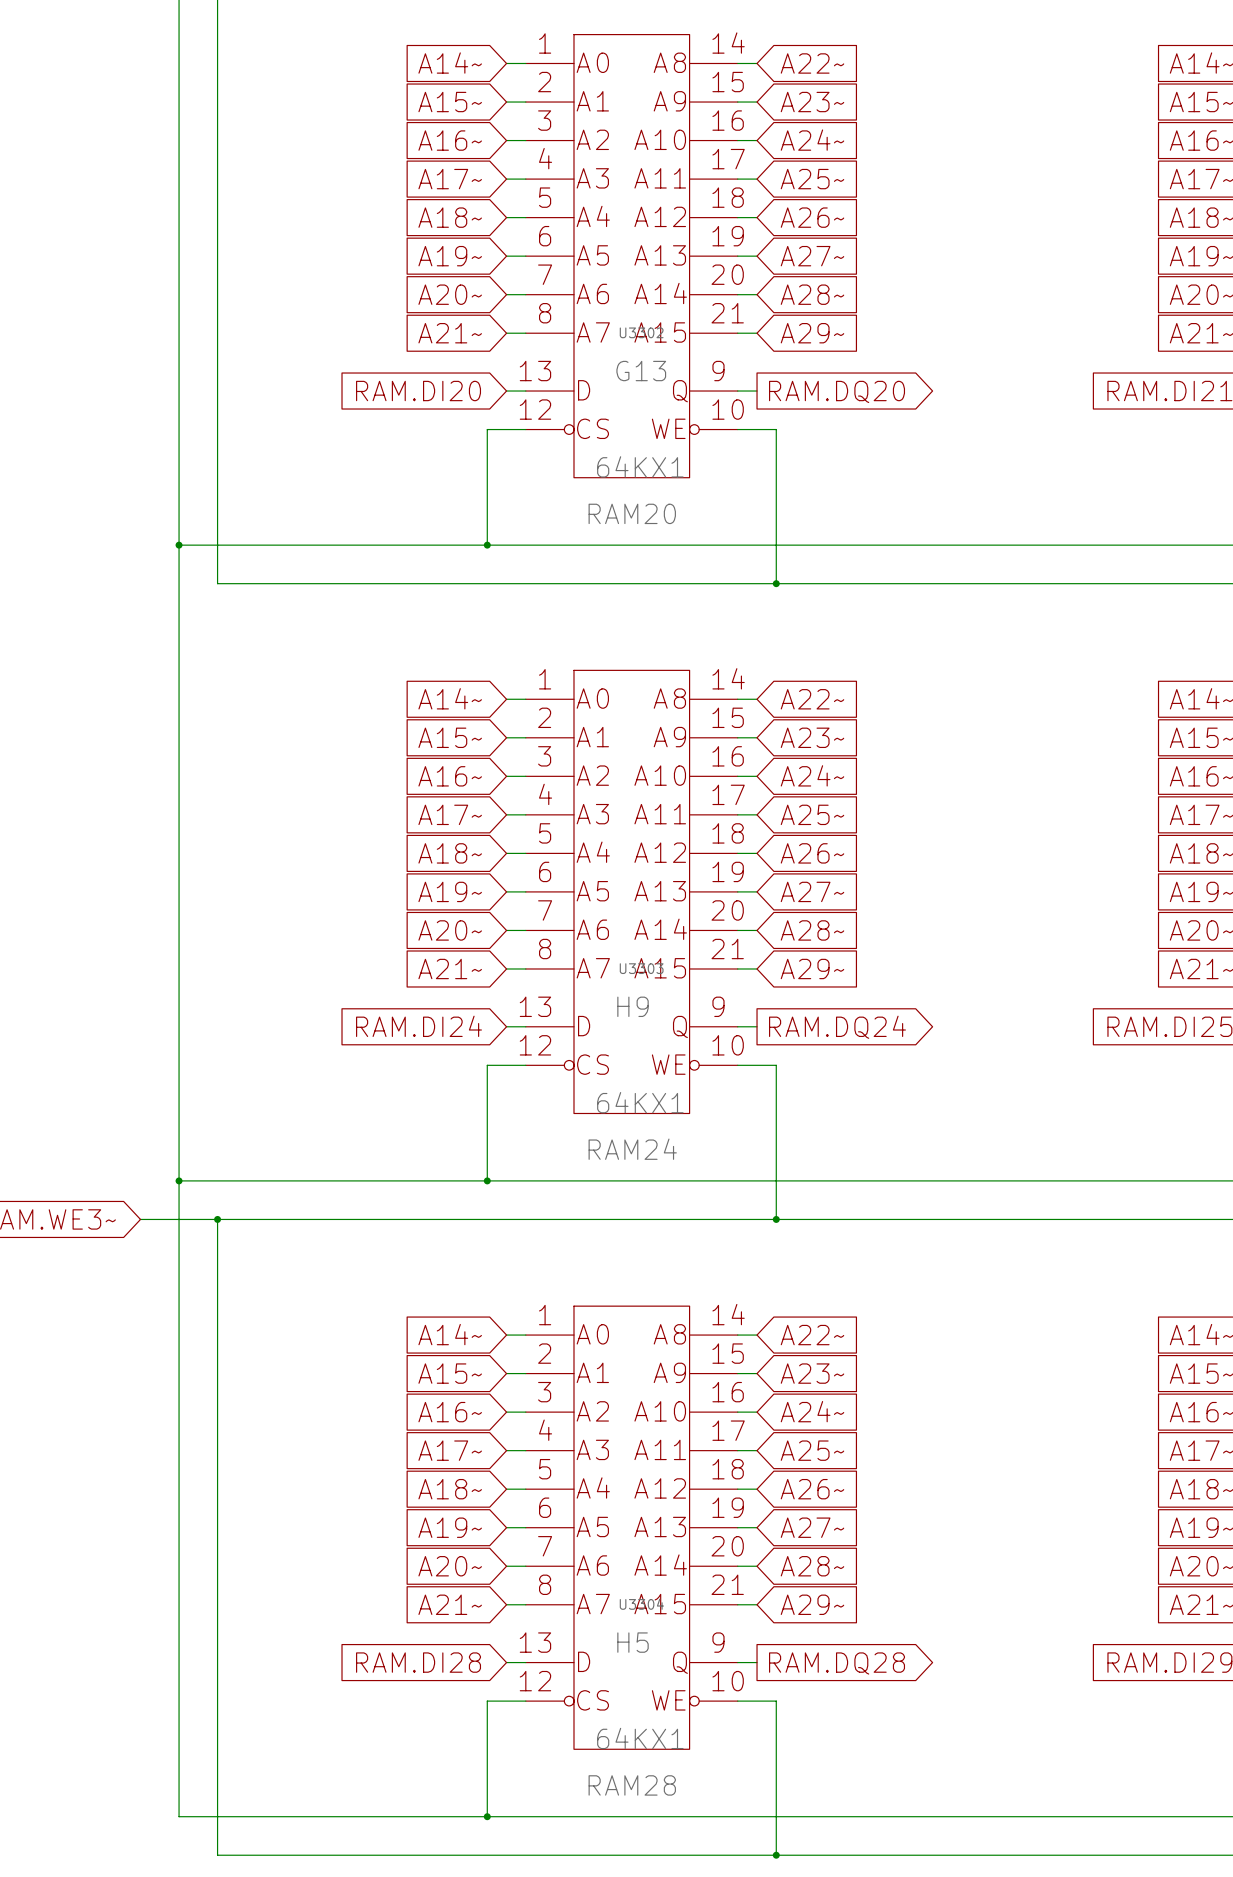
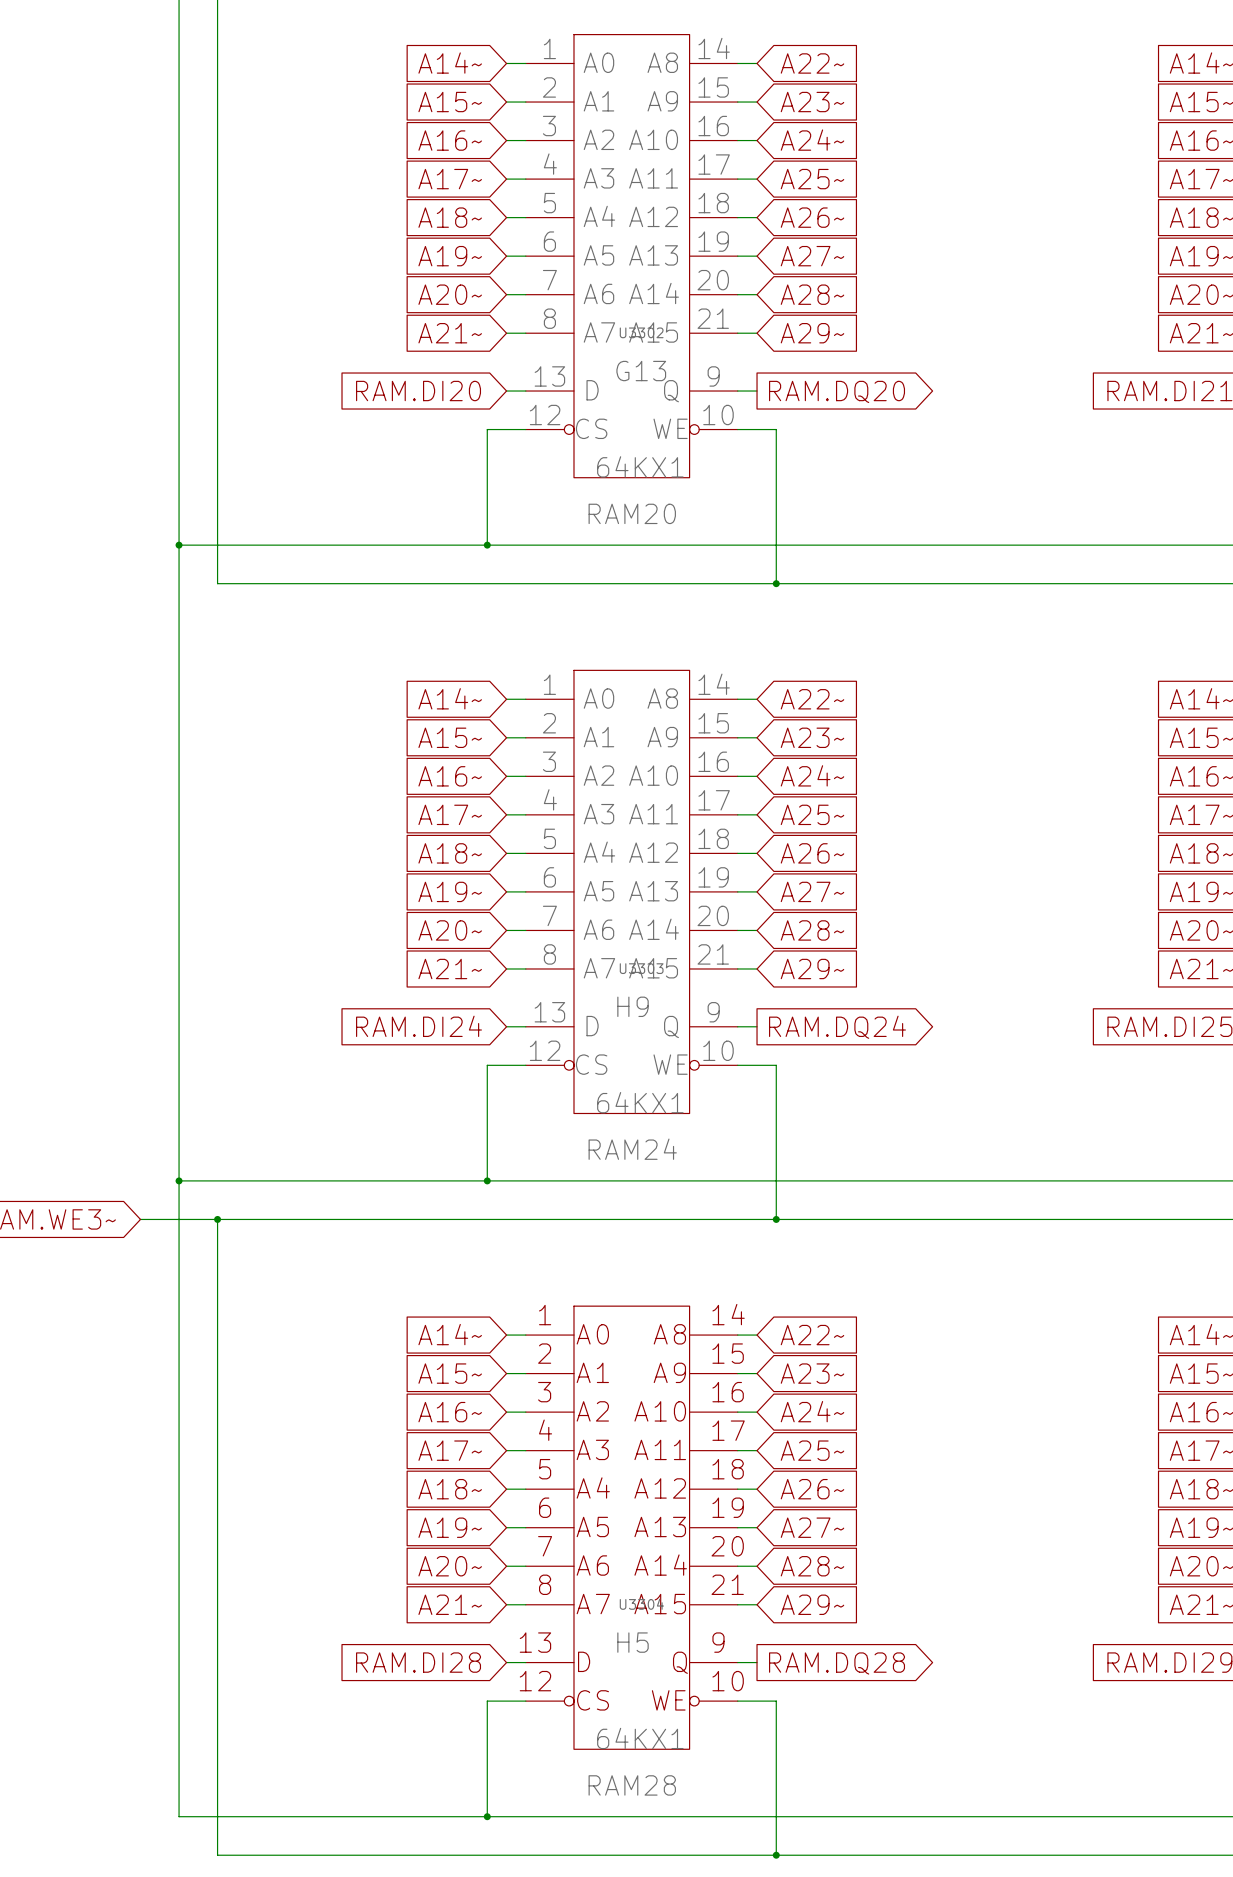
U3302 symbol: [525, 34, 738, 478] -> [525, 34, 738, 478]
U3303 symbol: [525, 670, 738, 1114] -> [525, 670, 738, 1114]

